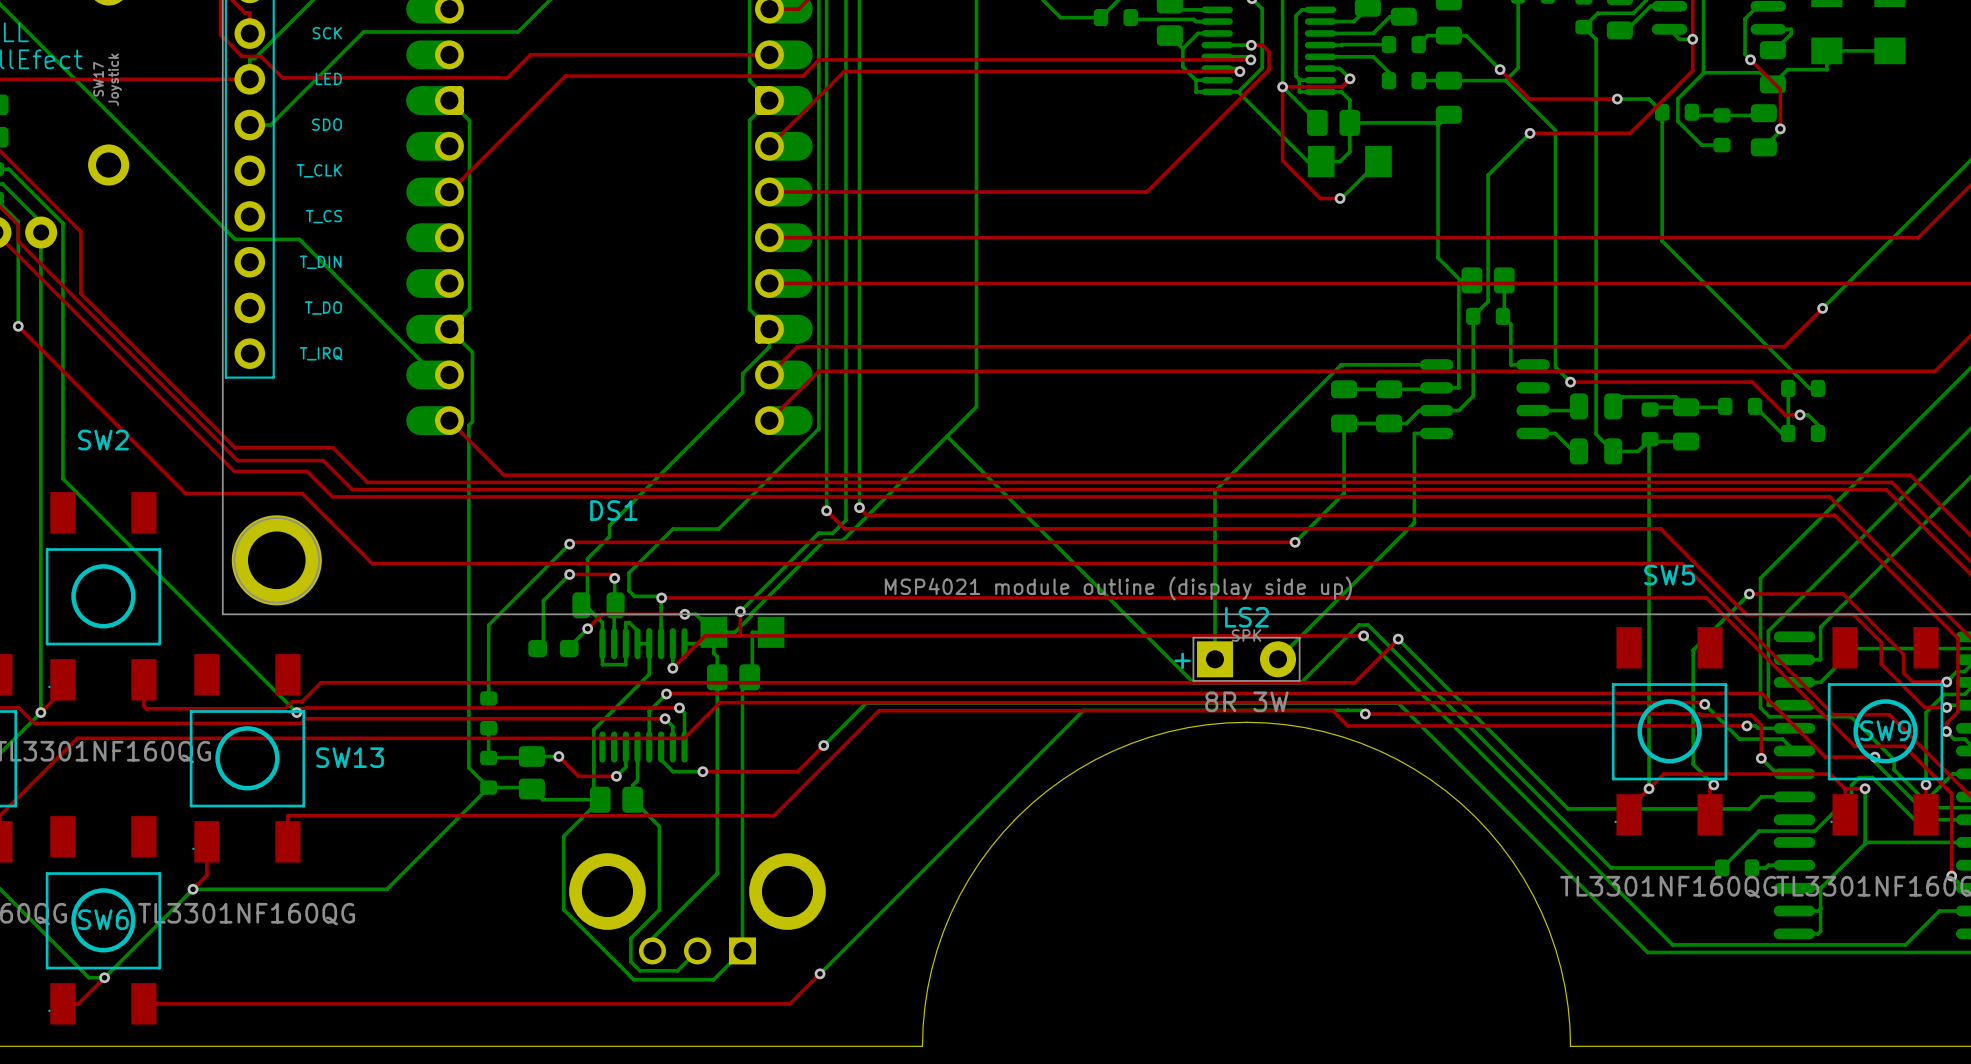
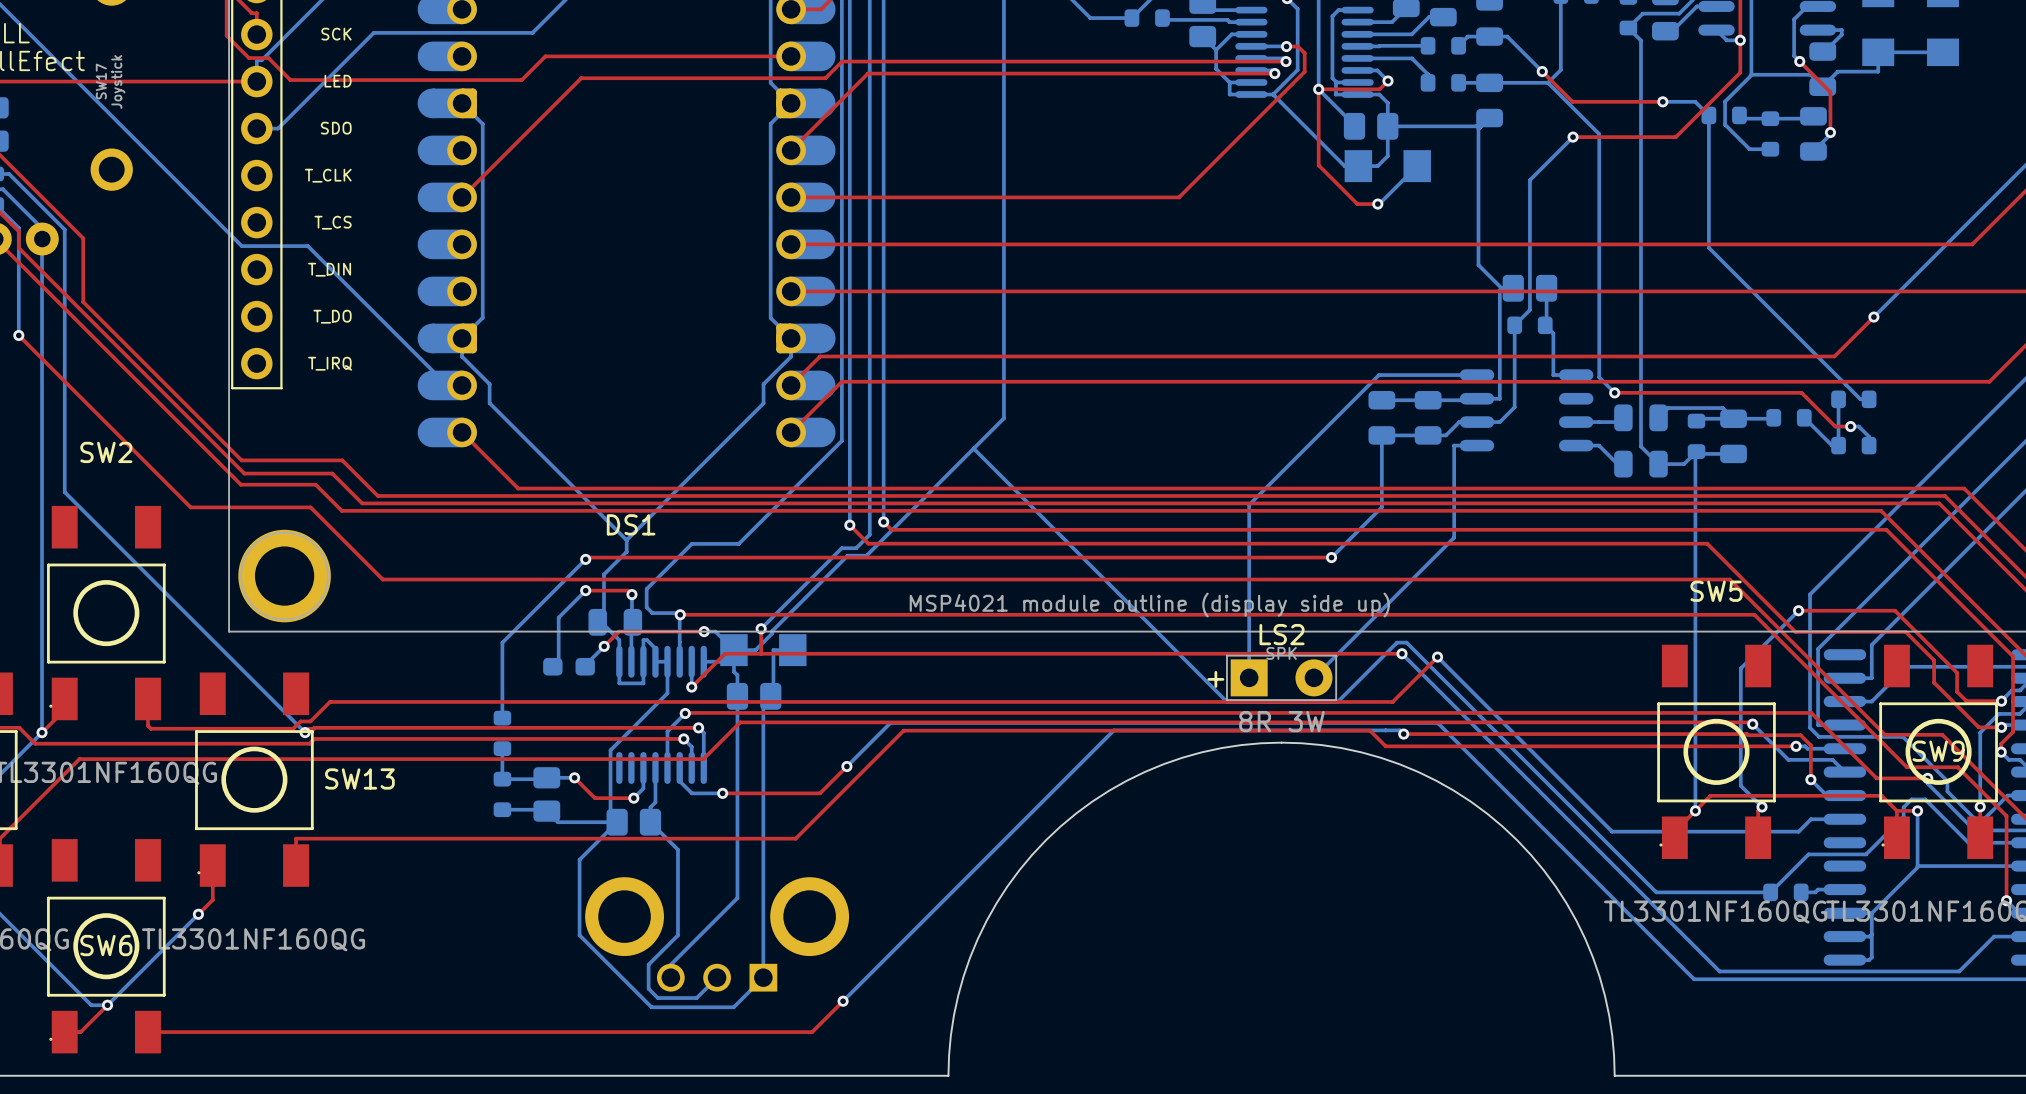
bottom track: (449, 329) (472, 352) (472, 421) (468, 425) (468, 767) (488, 787) (386, 889) (193, 889) -> (462, 338) (462, 356) (489, 384) (489, 403) (626, 540)

